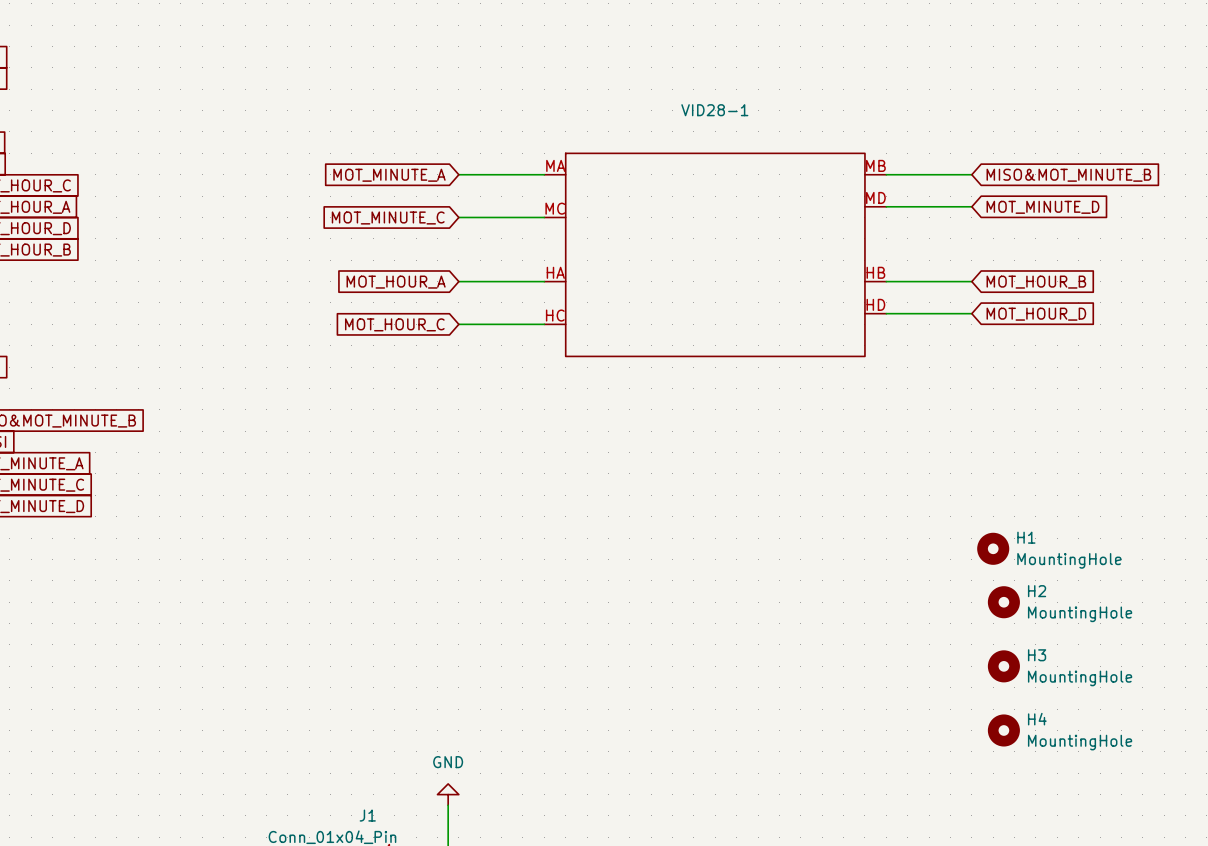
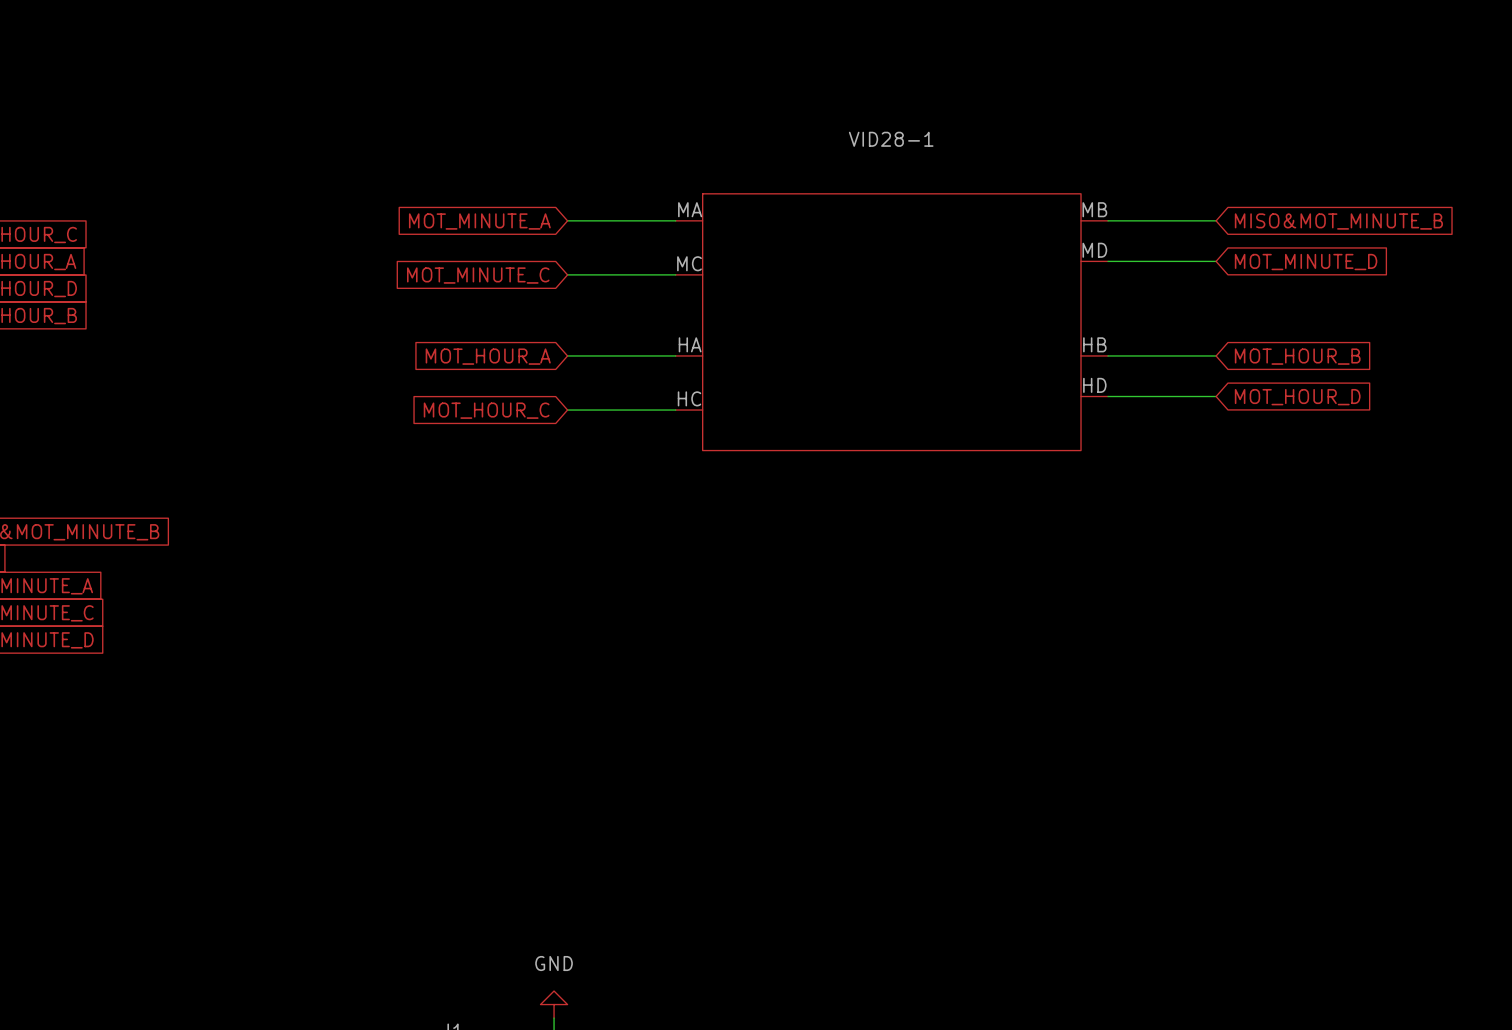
H1: MountingHole (993, 548) -> none
H2: MountingHole (1003, 602) -> none
H3: MountingHole (1003, 666) -> none
H4: MountingHole (1003, 730) -> none

